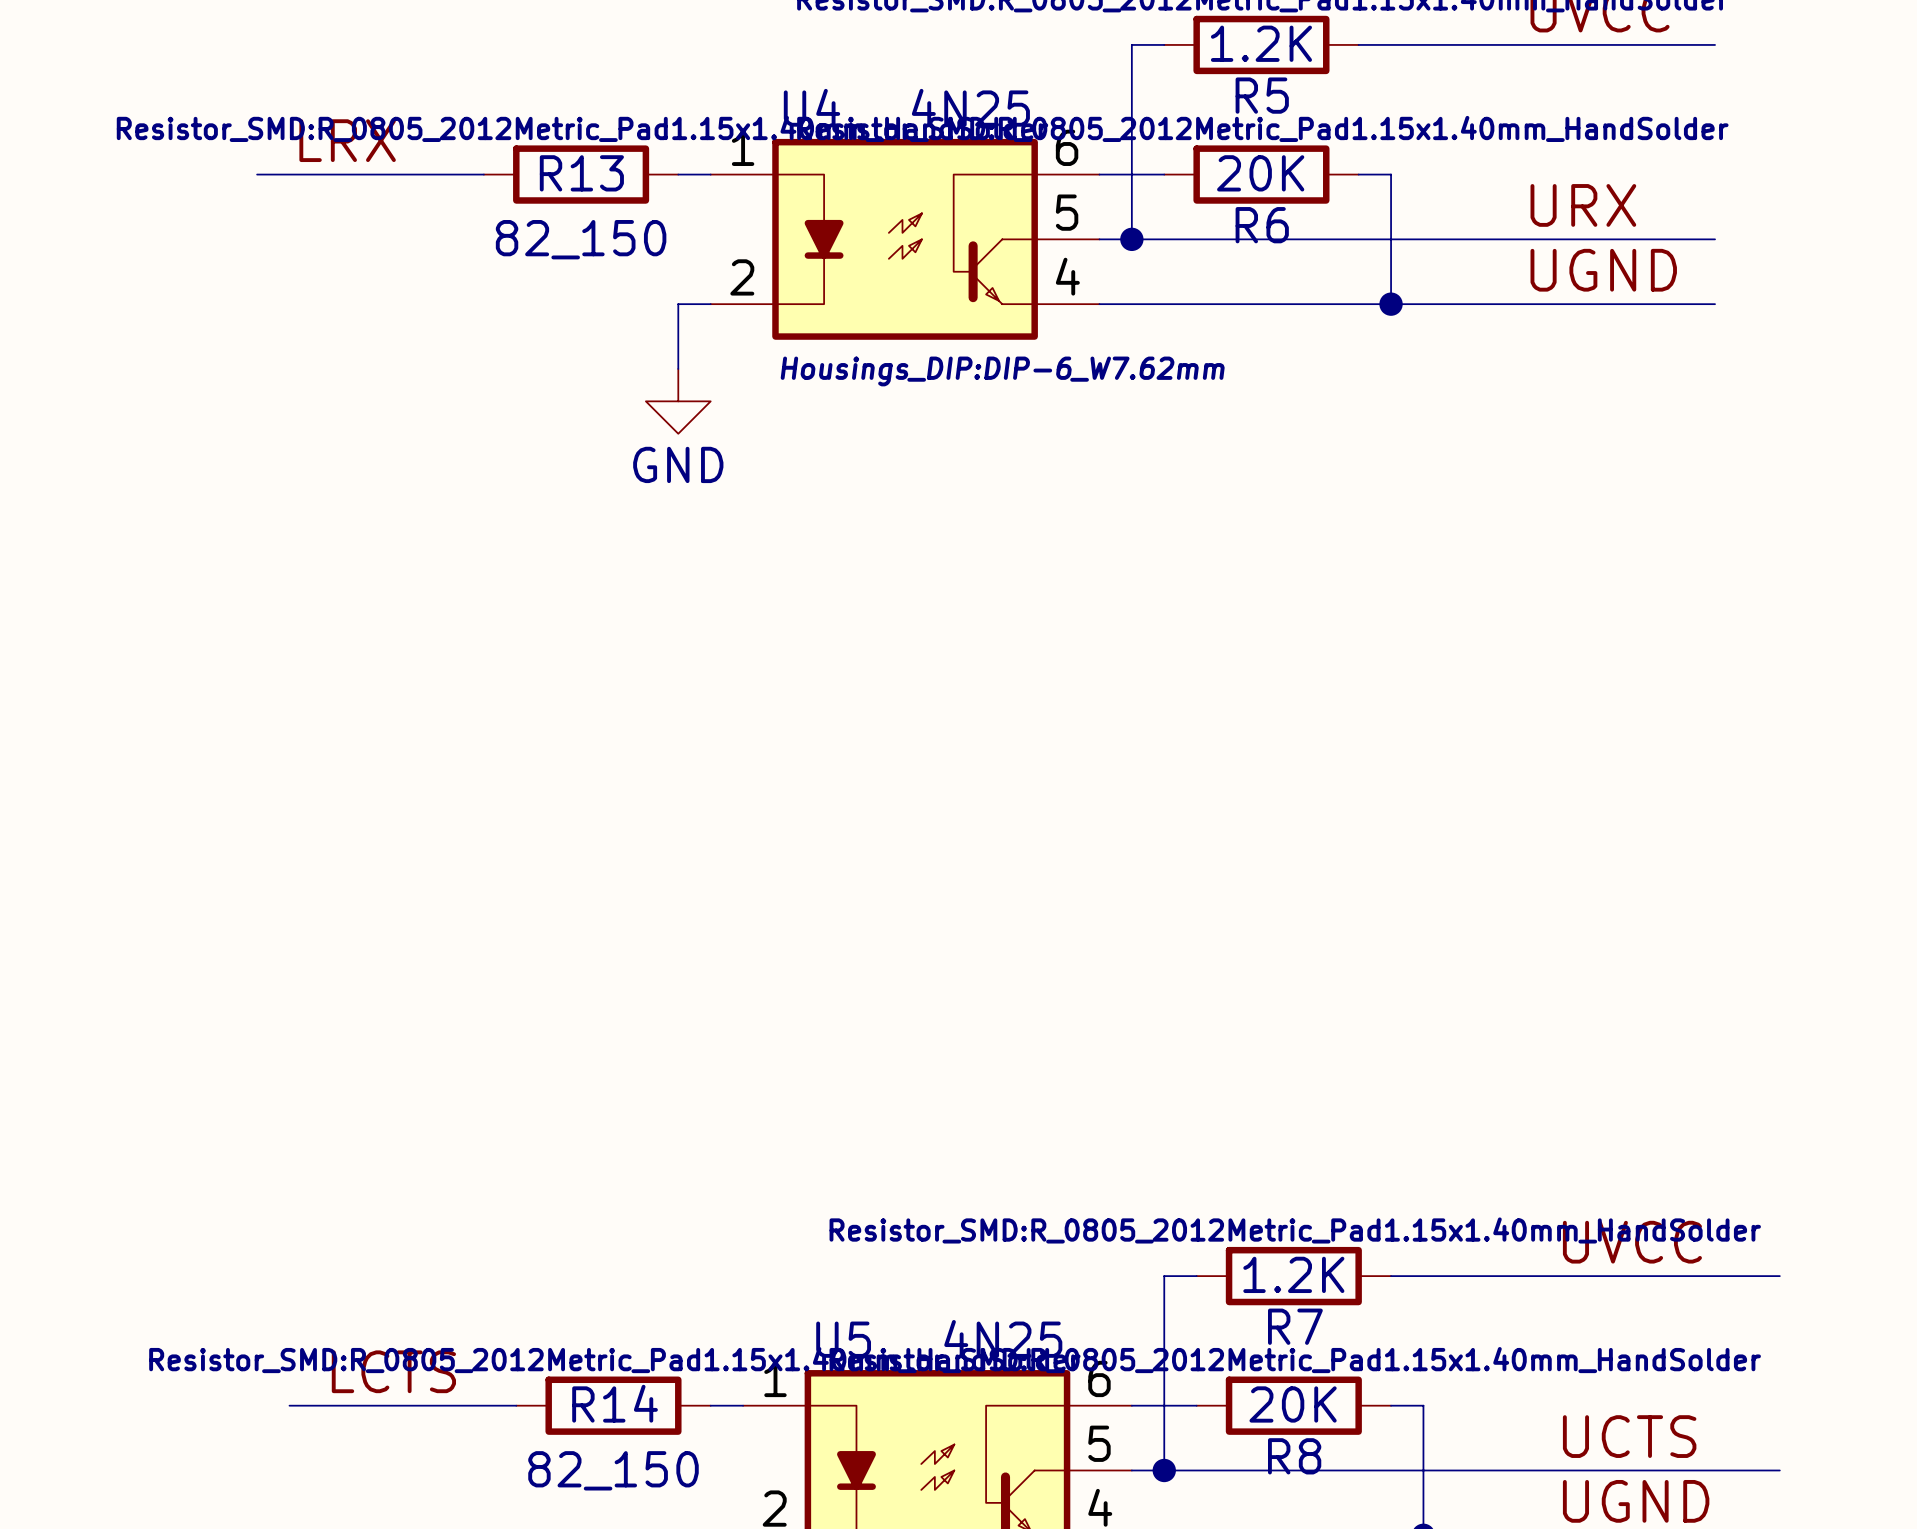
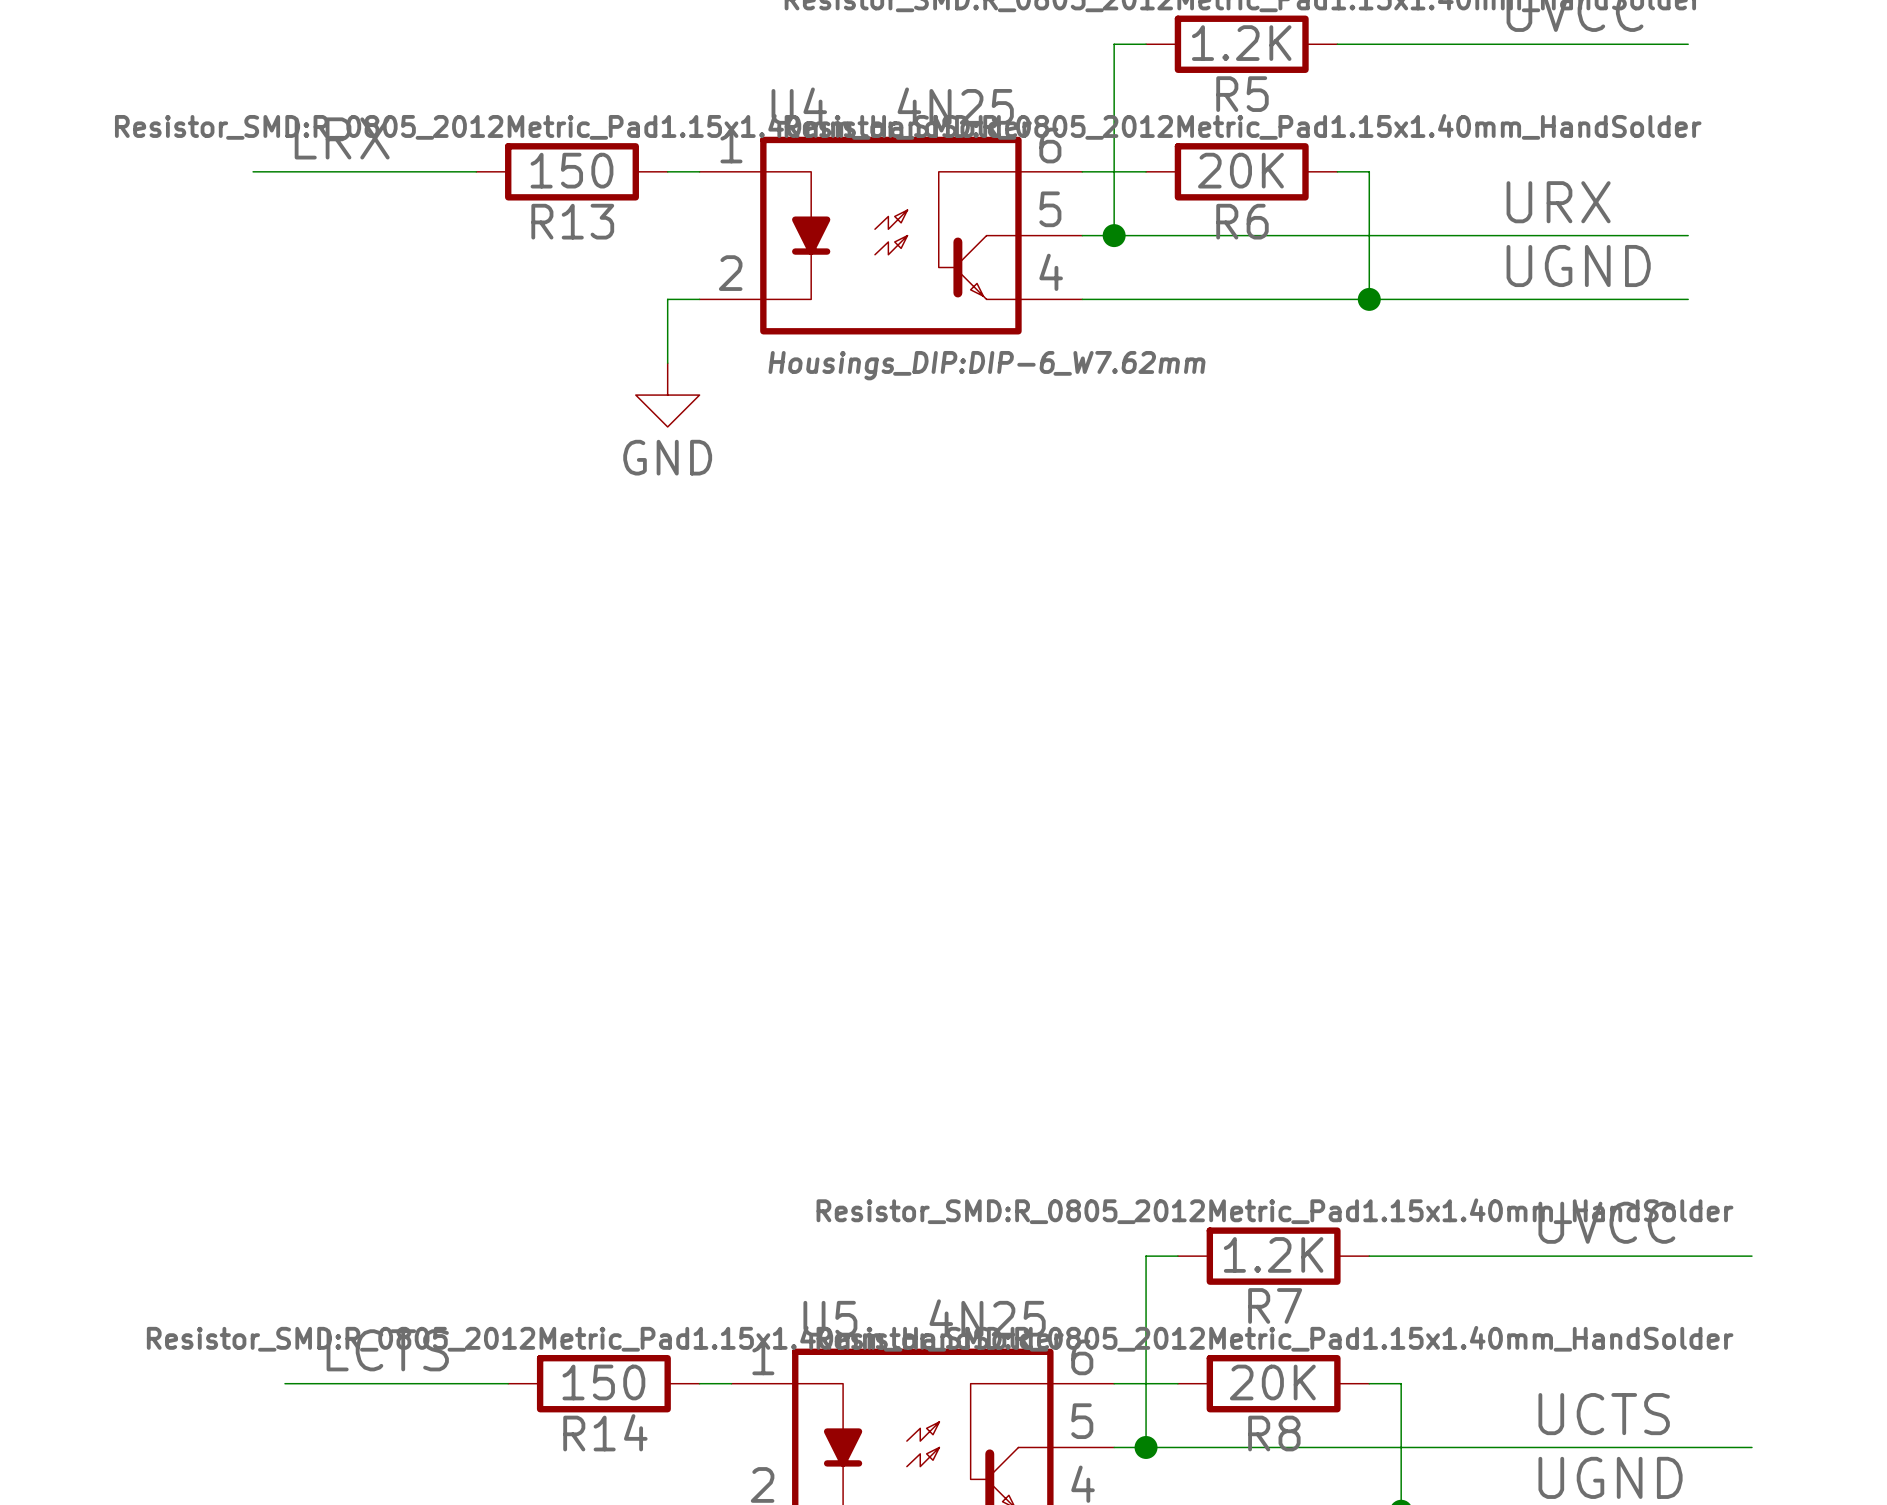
R13 name position: R13 (581, 173) -> R13 (572, 221)
R13 value: 82_150 (581, 239) -> 150 (572, 170)
R14 name position: R14 (615, 1403) -> R14 (605, 1432)
R14 value: 82_150 (613, 1470) -> 150 (603, 1382)

